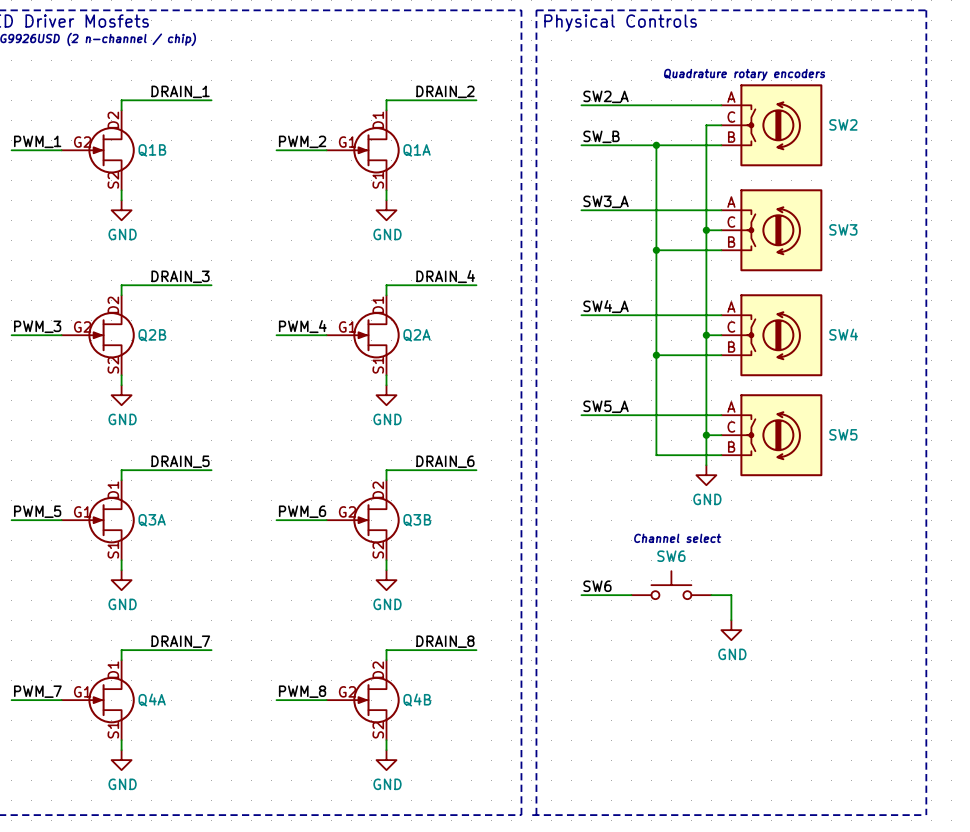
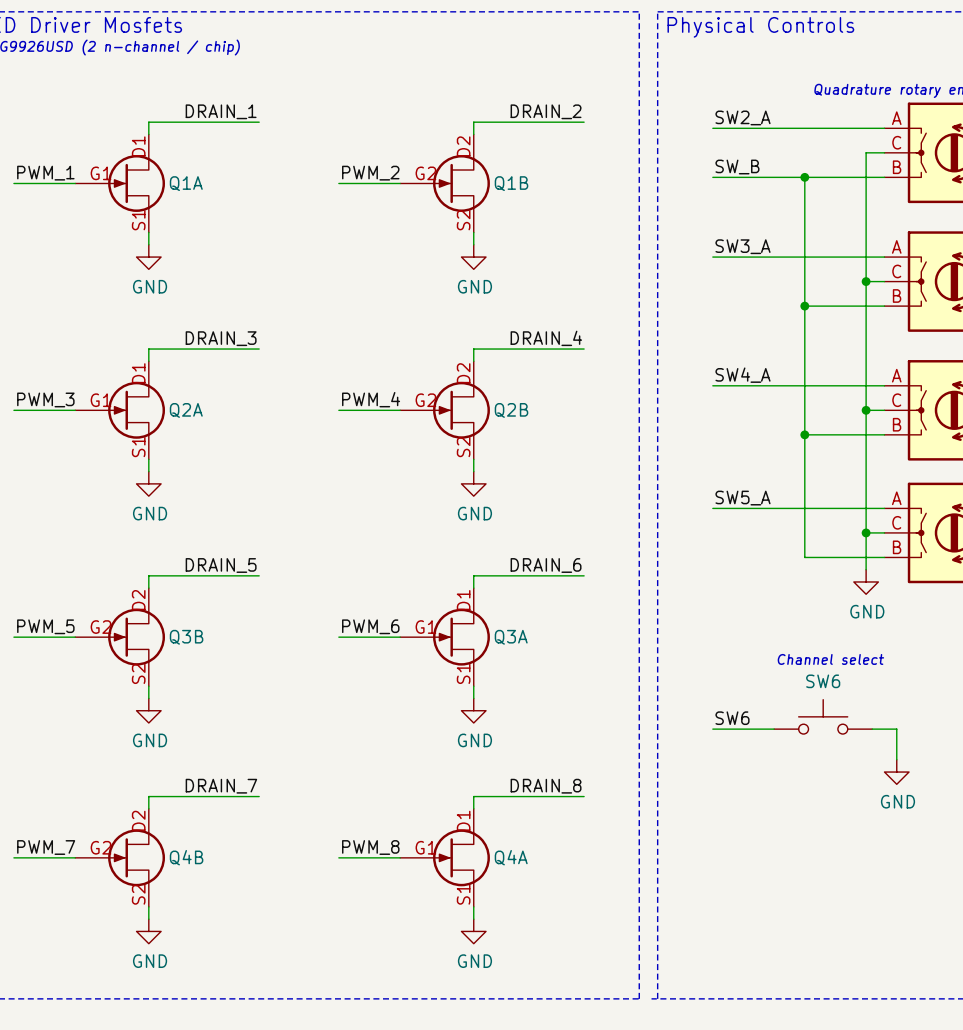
Q1B position: (98, 150) -> (445, 183)
Q1A position: (363, 150) -> (120, 183)
Q2B position: (98, 335) -> (445, 410)
Q2A position: (363, 335) -> (120, 410)
Q3A position: (98, 520) -> (445, 637)
Q3B position: (363, 520) -> (120, 637)
Q4A position: (98, 700) -> (445, 857)
Q4B position: (363, 700) -> (120, 857)

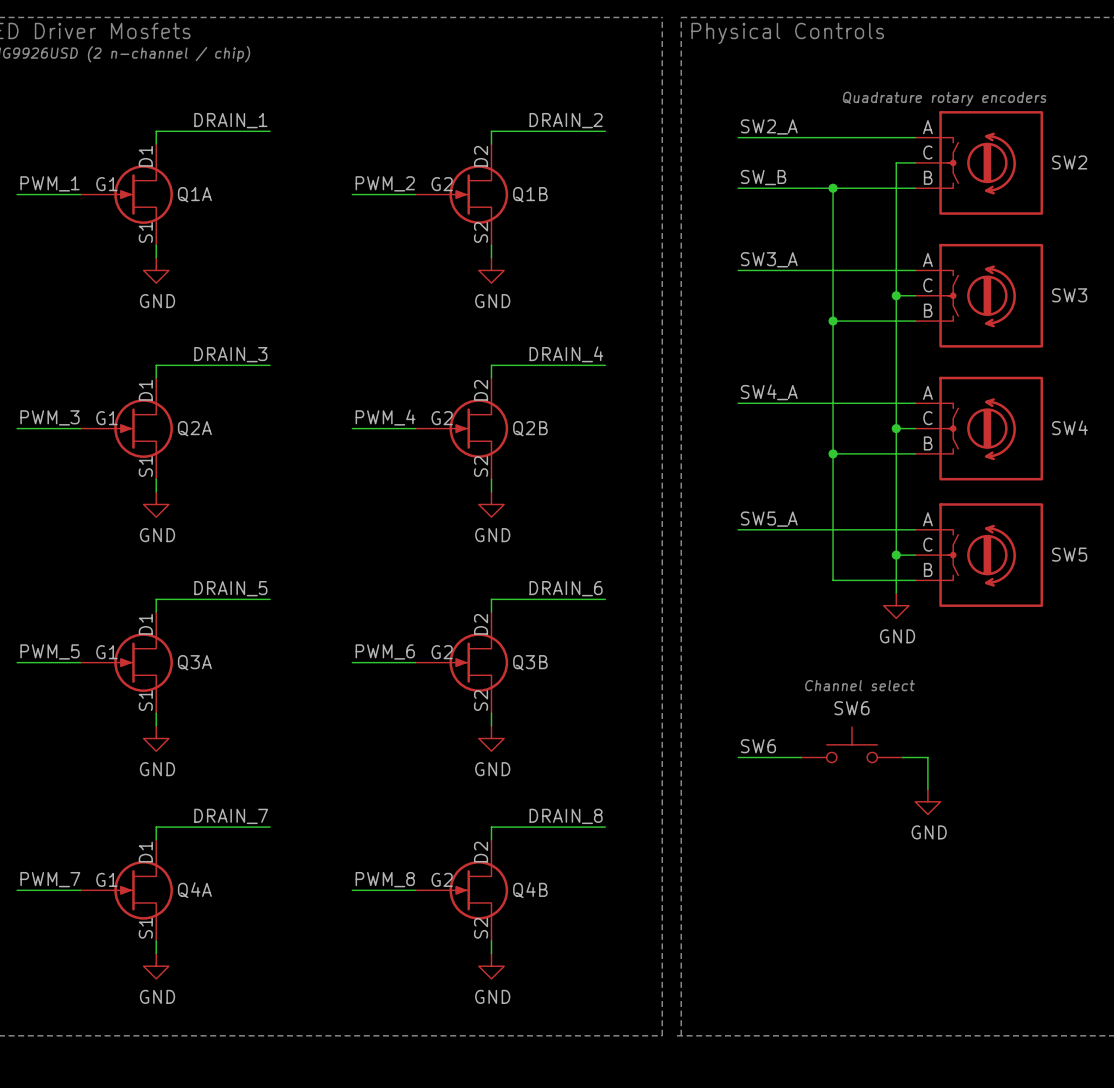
Q3B position: (120, 637) -> (461, 662)
Q3A position: (445, 637) -> (126, 662)
Q4B position: (120, 857) -> (461, 890)
Q4A position: (445, 857) -> (126, 890)

